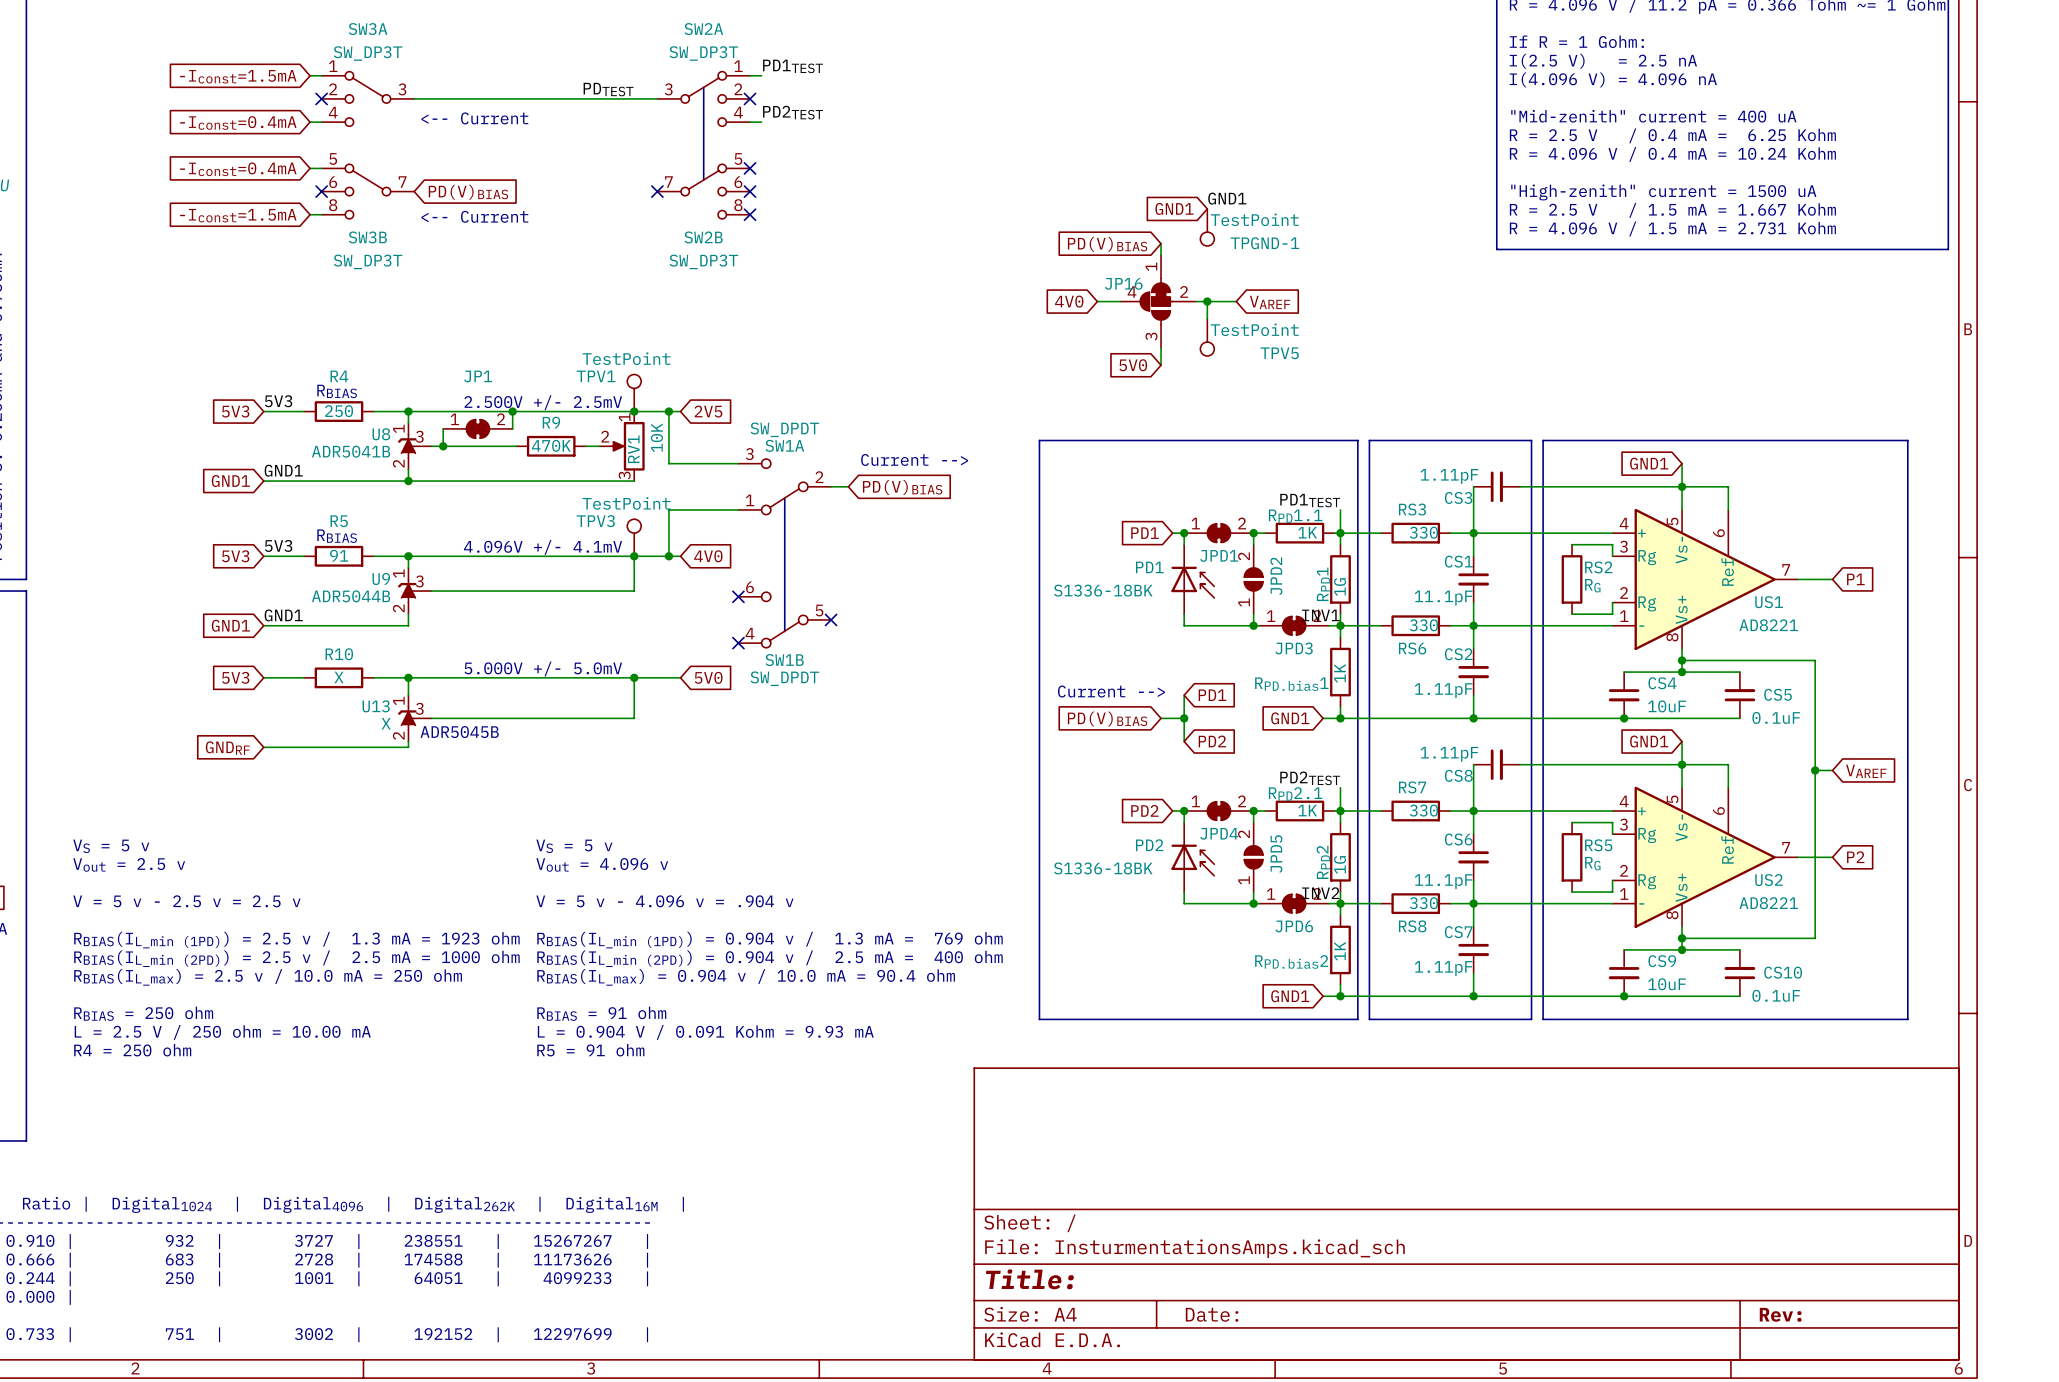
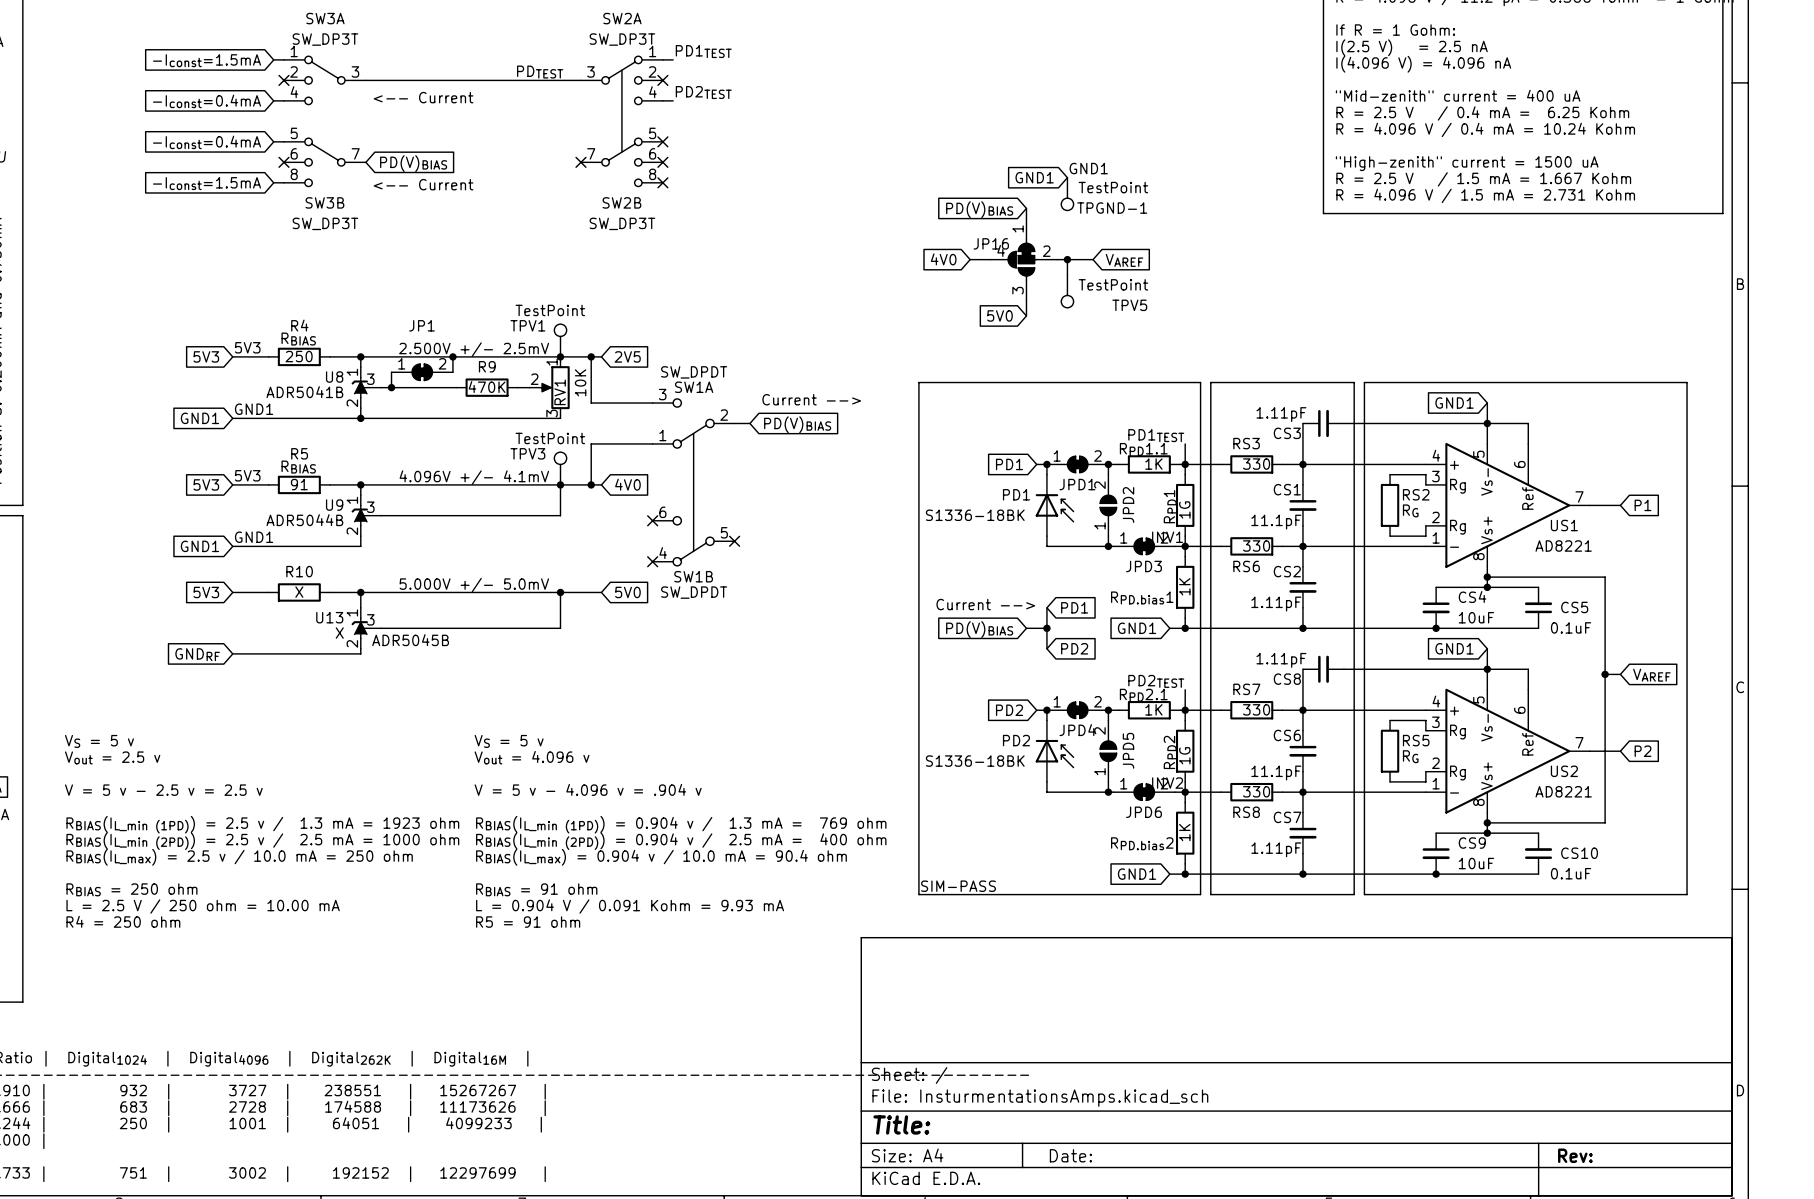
text: none -> SIM-PASS (958, 886)

